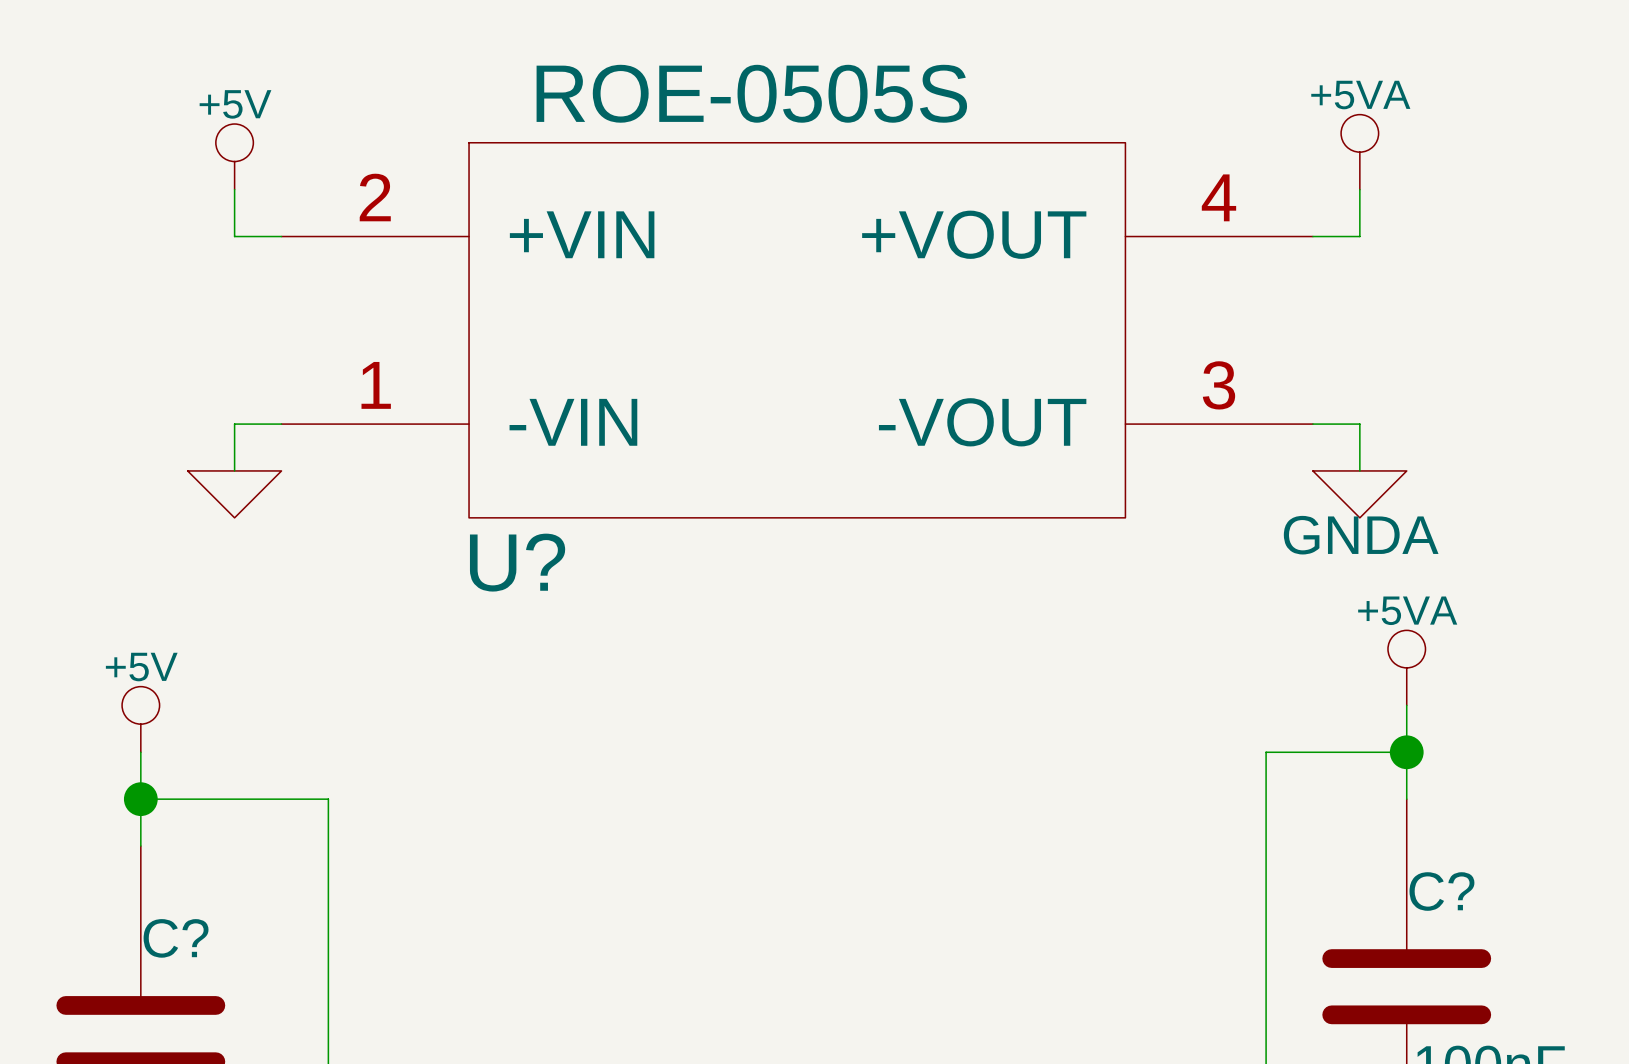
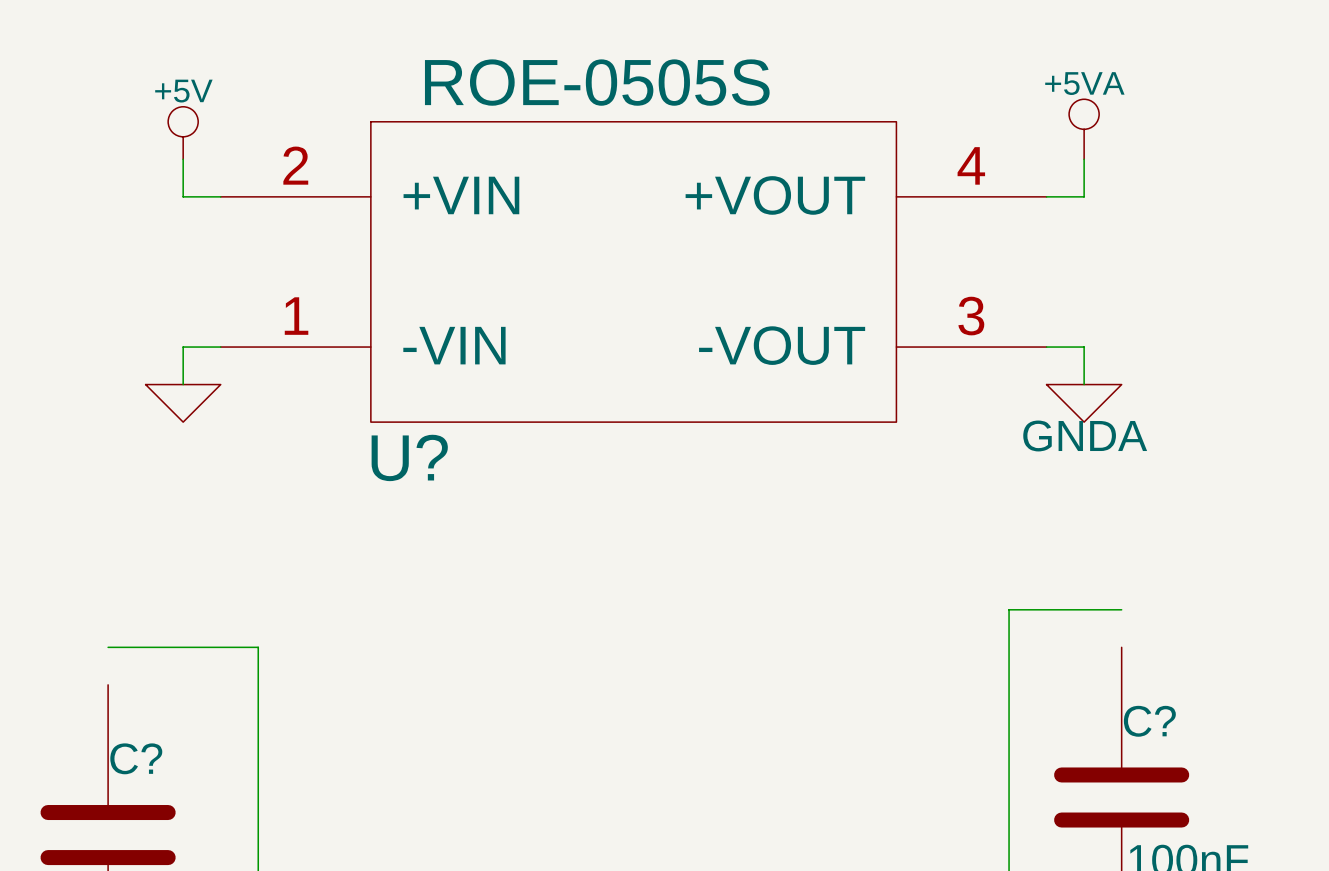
power symbol: +5VA (1406, 667) -> none
wire: (1406, 705) (1406, 799) -> none
power symbol: +5V (140, 719) -> none
wire: (140, 752) (140, 846) -> none
junction: (1406, 752) -> none
junction: (140, 799) -> none

